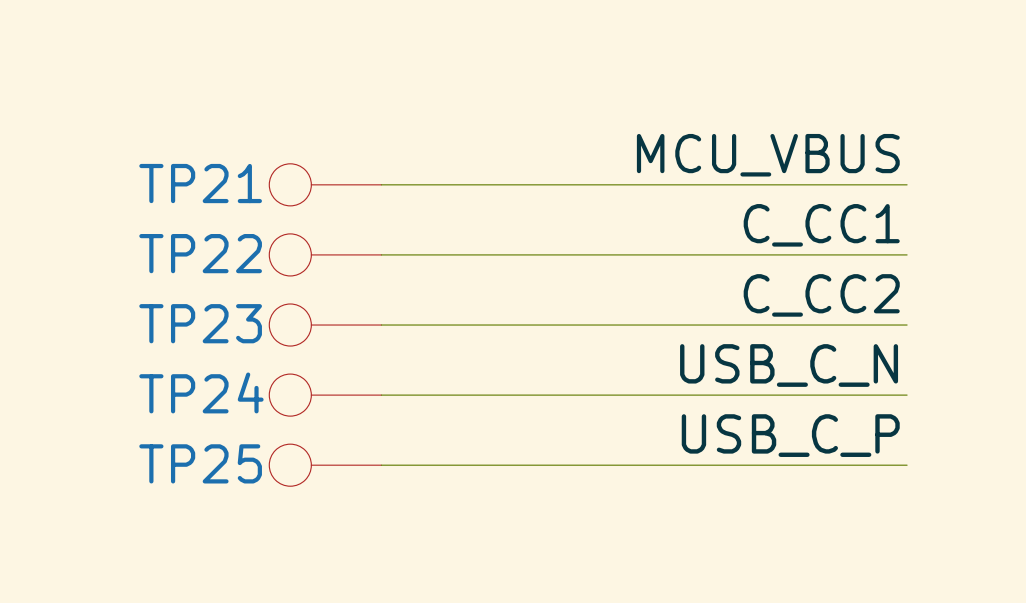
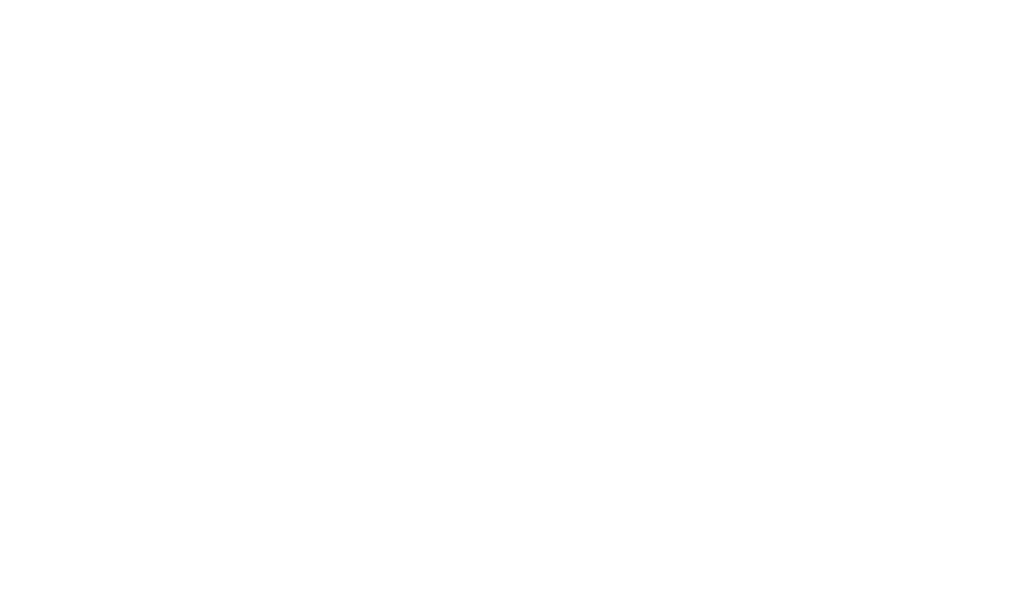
label: MCU_VBUS (768, 155) -> none
TP21: (325, 184) -> none
wire: (381, 184) (907, 184) -> none
label: C_CC1 (821, 225) -> none
TP22: (325, 254) -> none
wire: (381, 254) (907, 254) -> none
label: C_CC2 (821, 295) -> none
TP23: (325, 325) -> none
wire: (381, 325) (907, 325) -> none
label: USB_C_N (789, 365) -> none
TP24: (325, 395) -> none
wire: (381, 395) (907, 395) -> none
label: USB_C_P (790, 435) -> none
TP25: (325, 465) -> none
wire: (381, 465) (907, 465) -> none

